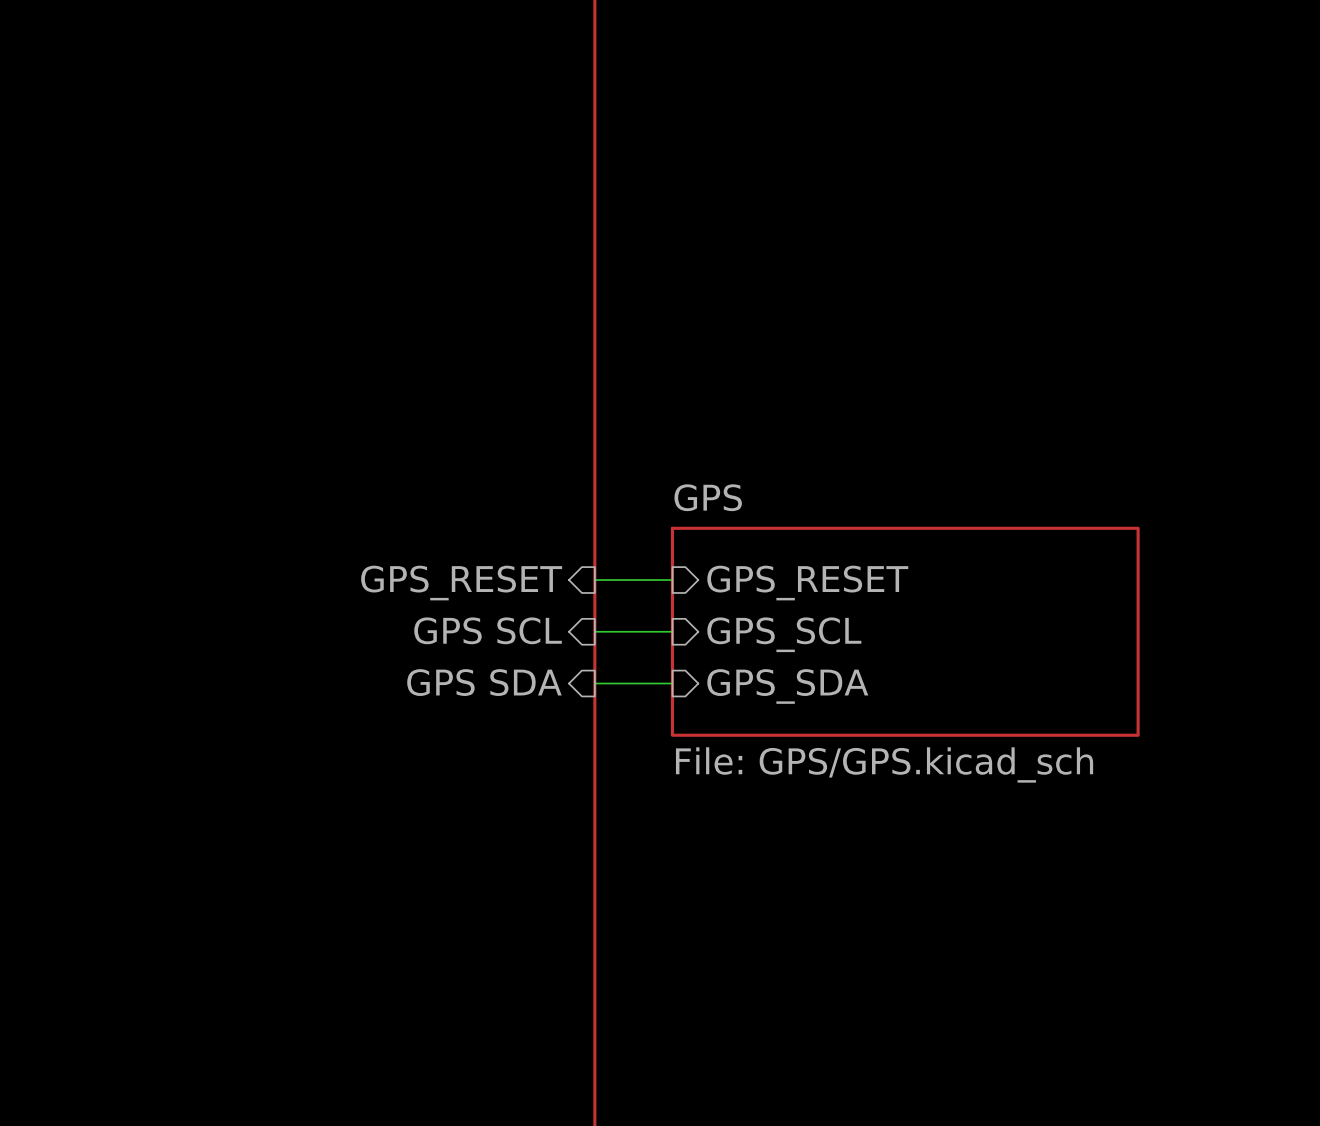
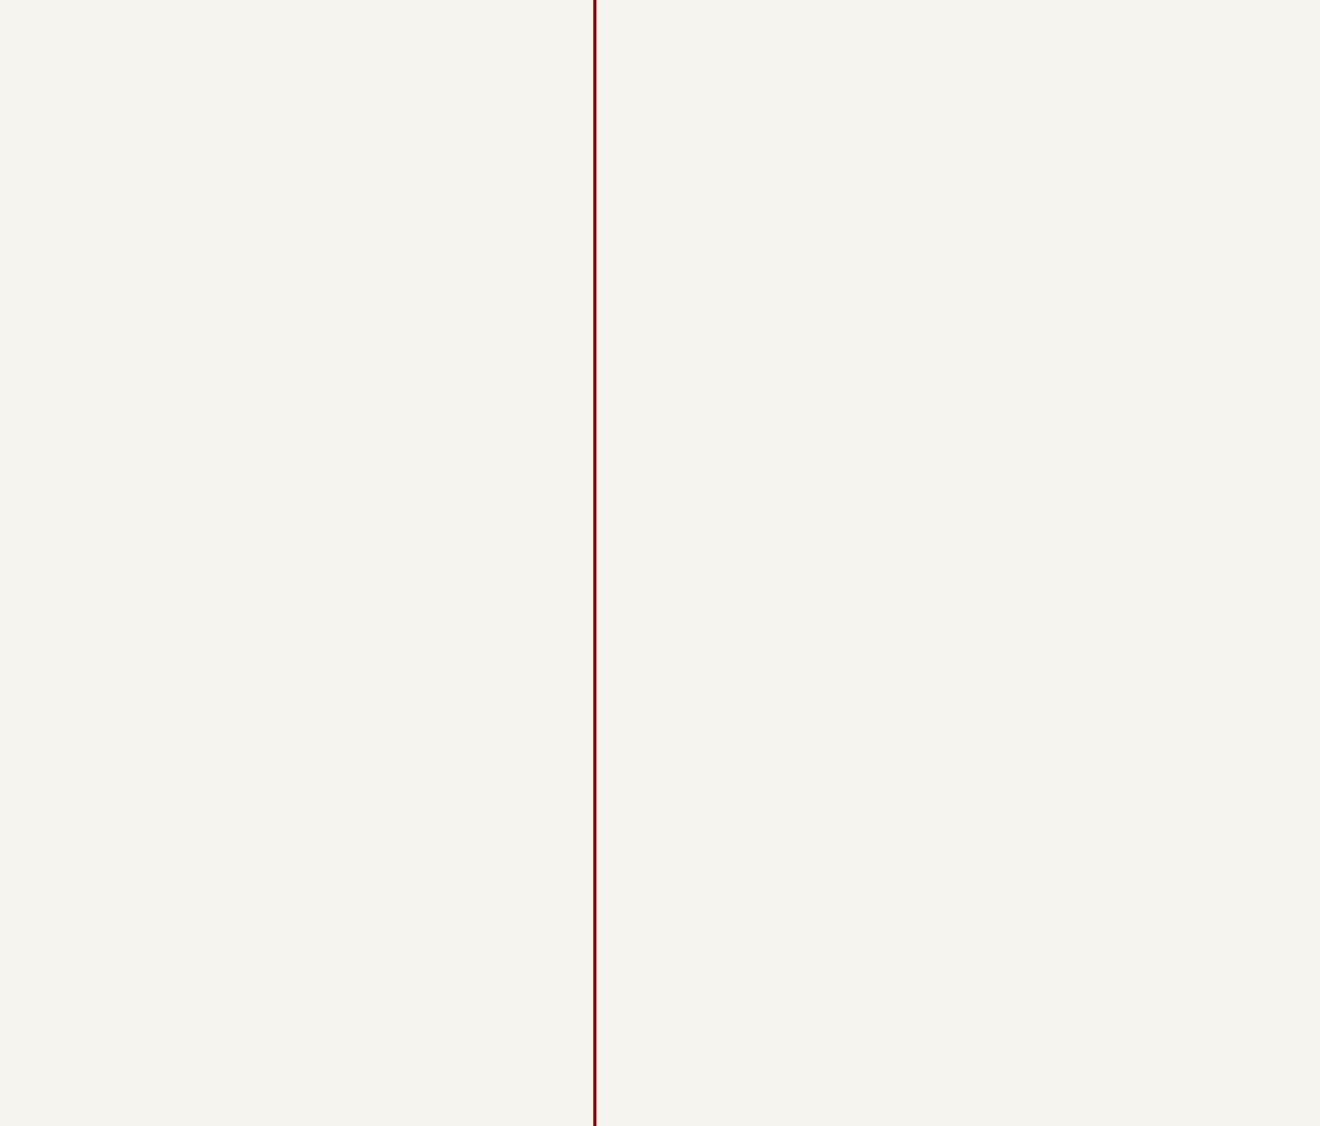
wire: (594, 580) (672, 580) -> none
sheet pin: GPS_RESET (461, 583) -> none
sheet pin: GPS_RESET (807, 583) -> none
sheet pin: GPS SCL (488, 630) -> none
wire: (594, 631) (672, 631) -> none
sheet GPS: File: GPS/GPS.kicad_sch (905, 631) -> none
sheet pin: GPS_SCL (784, 634) -> none
sheet pin: GPS SDA (484, 682) -> none
wire: (594, 683) (672, 683) -> none
sheet pin: GPS_SDA (787, 686) -> none

